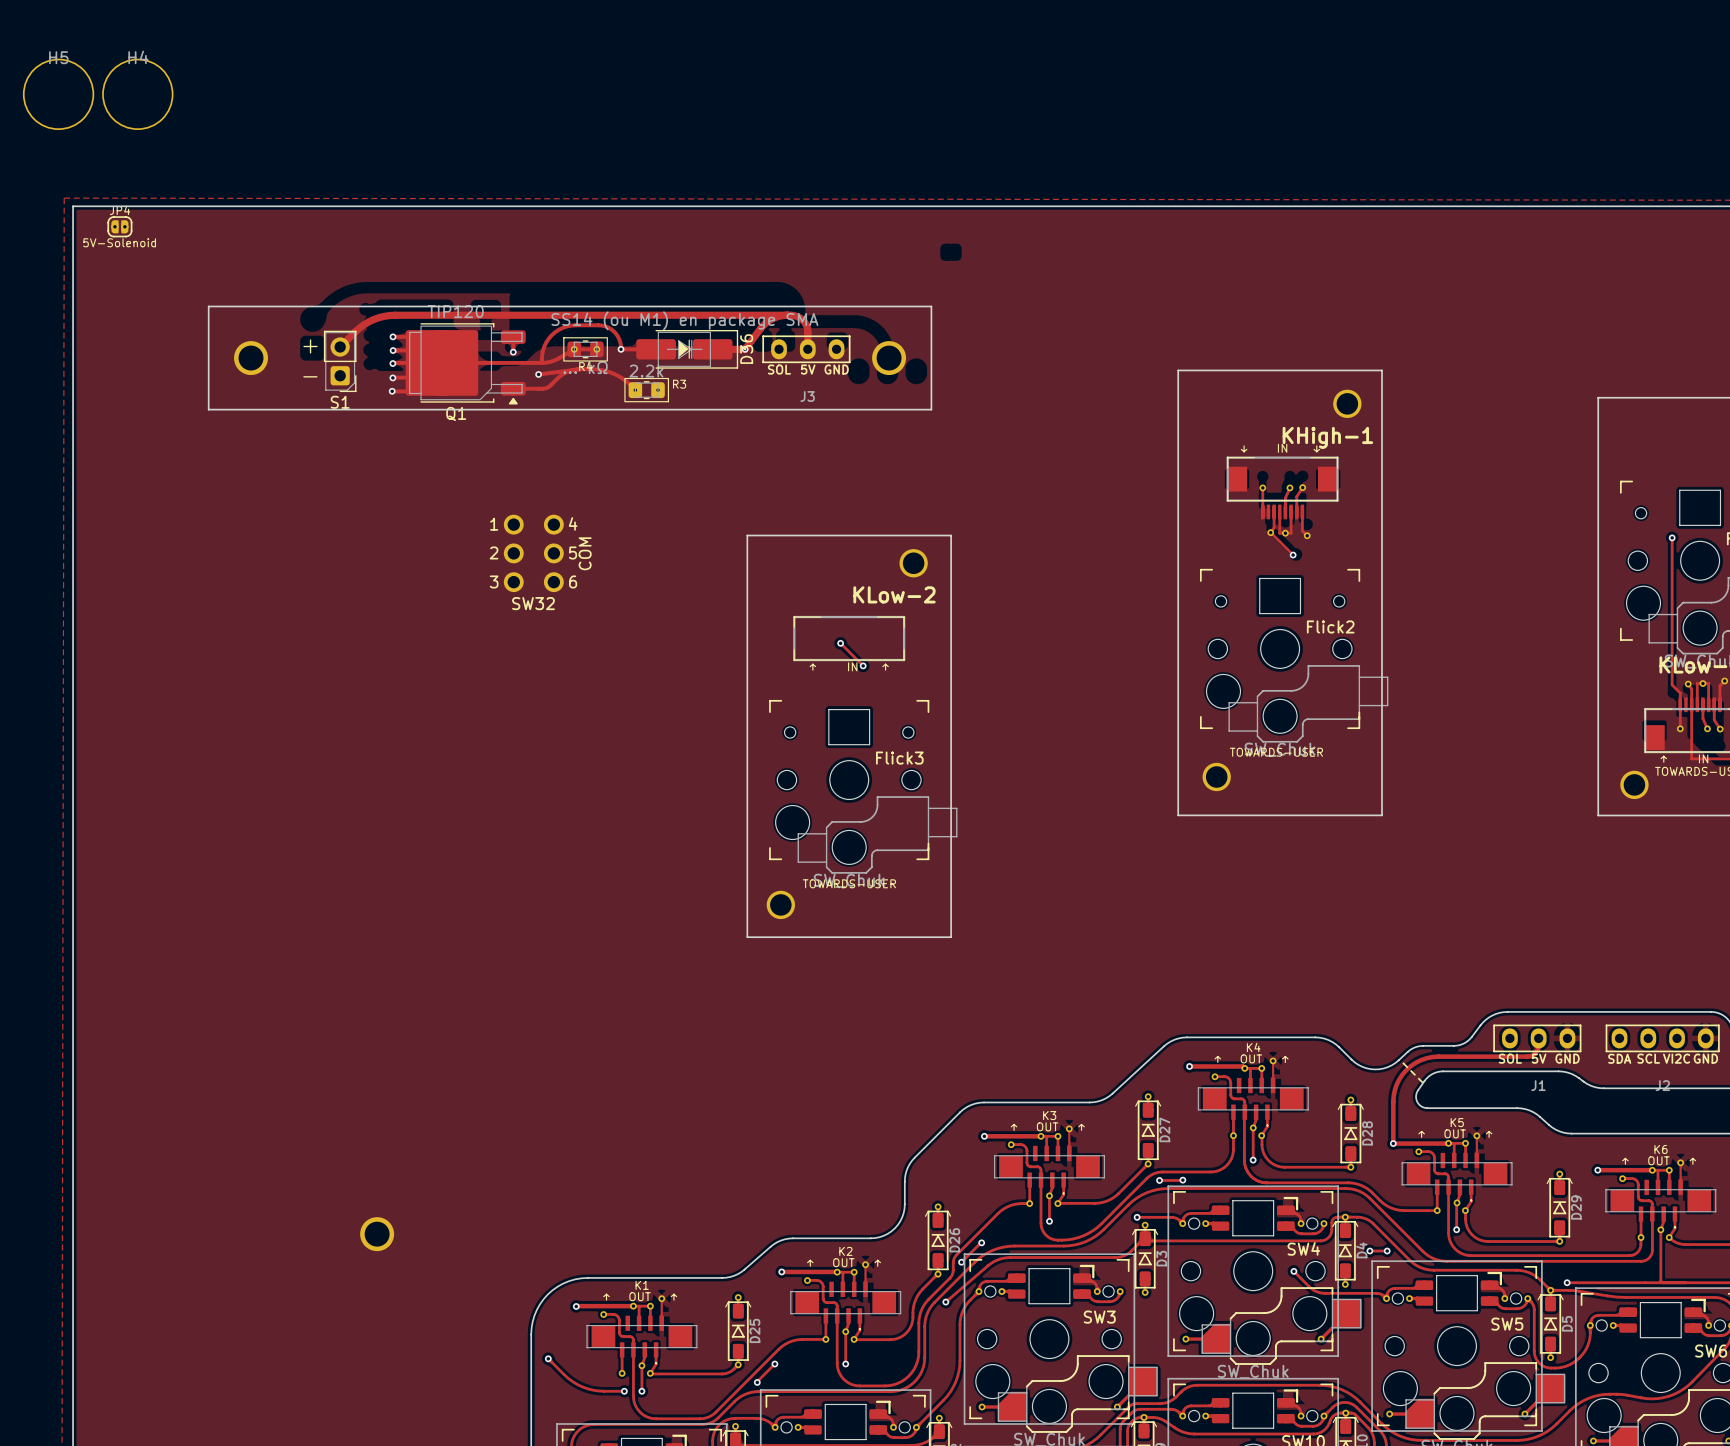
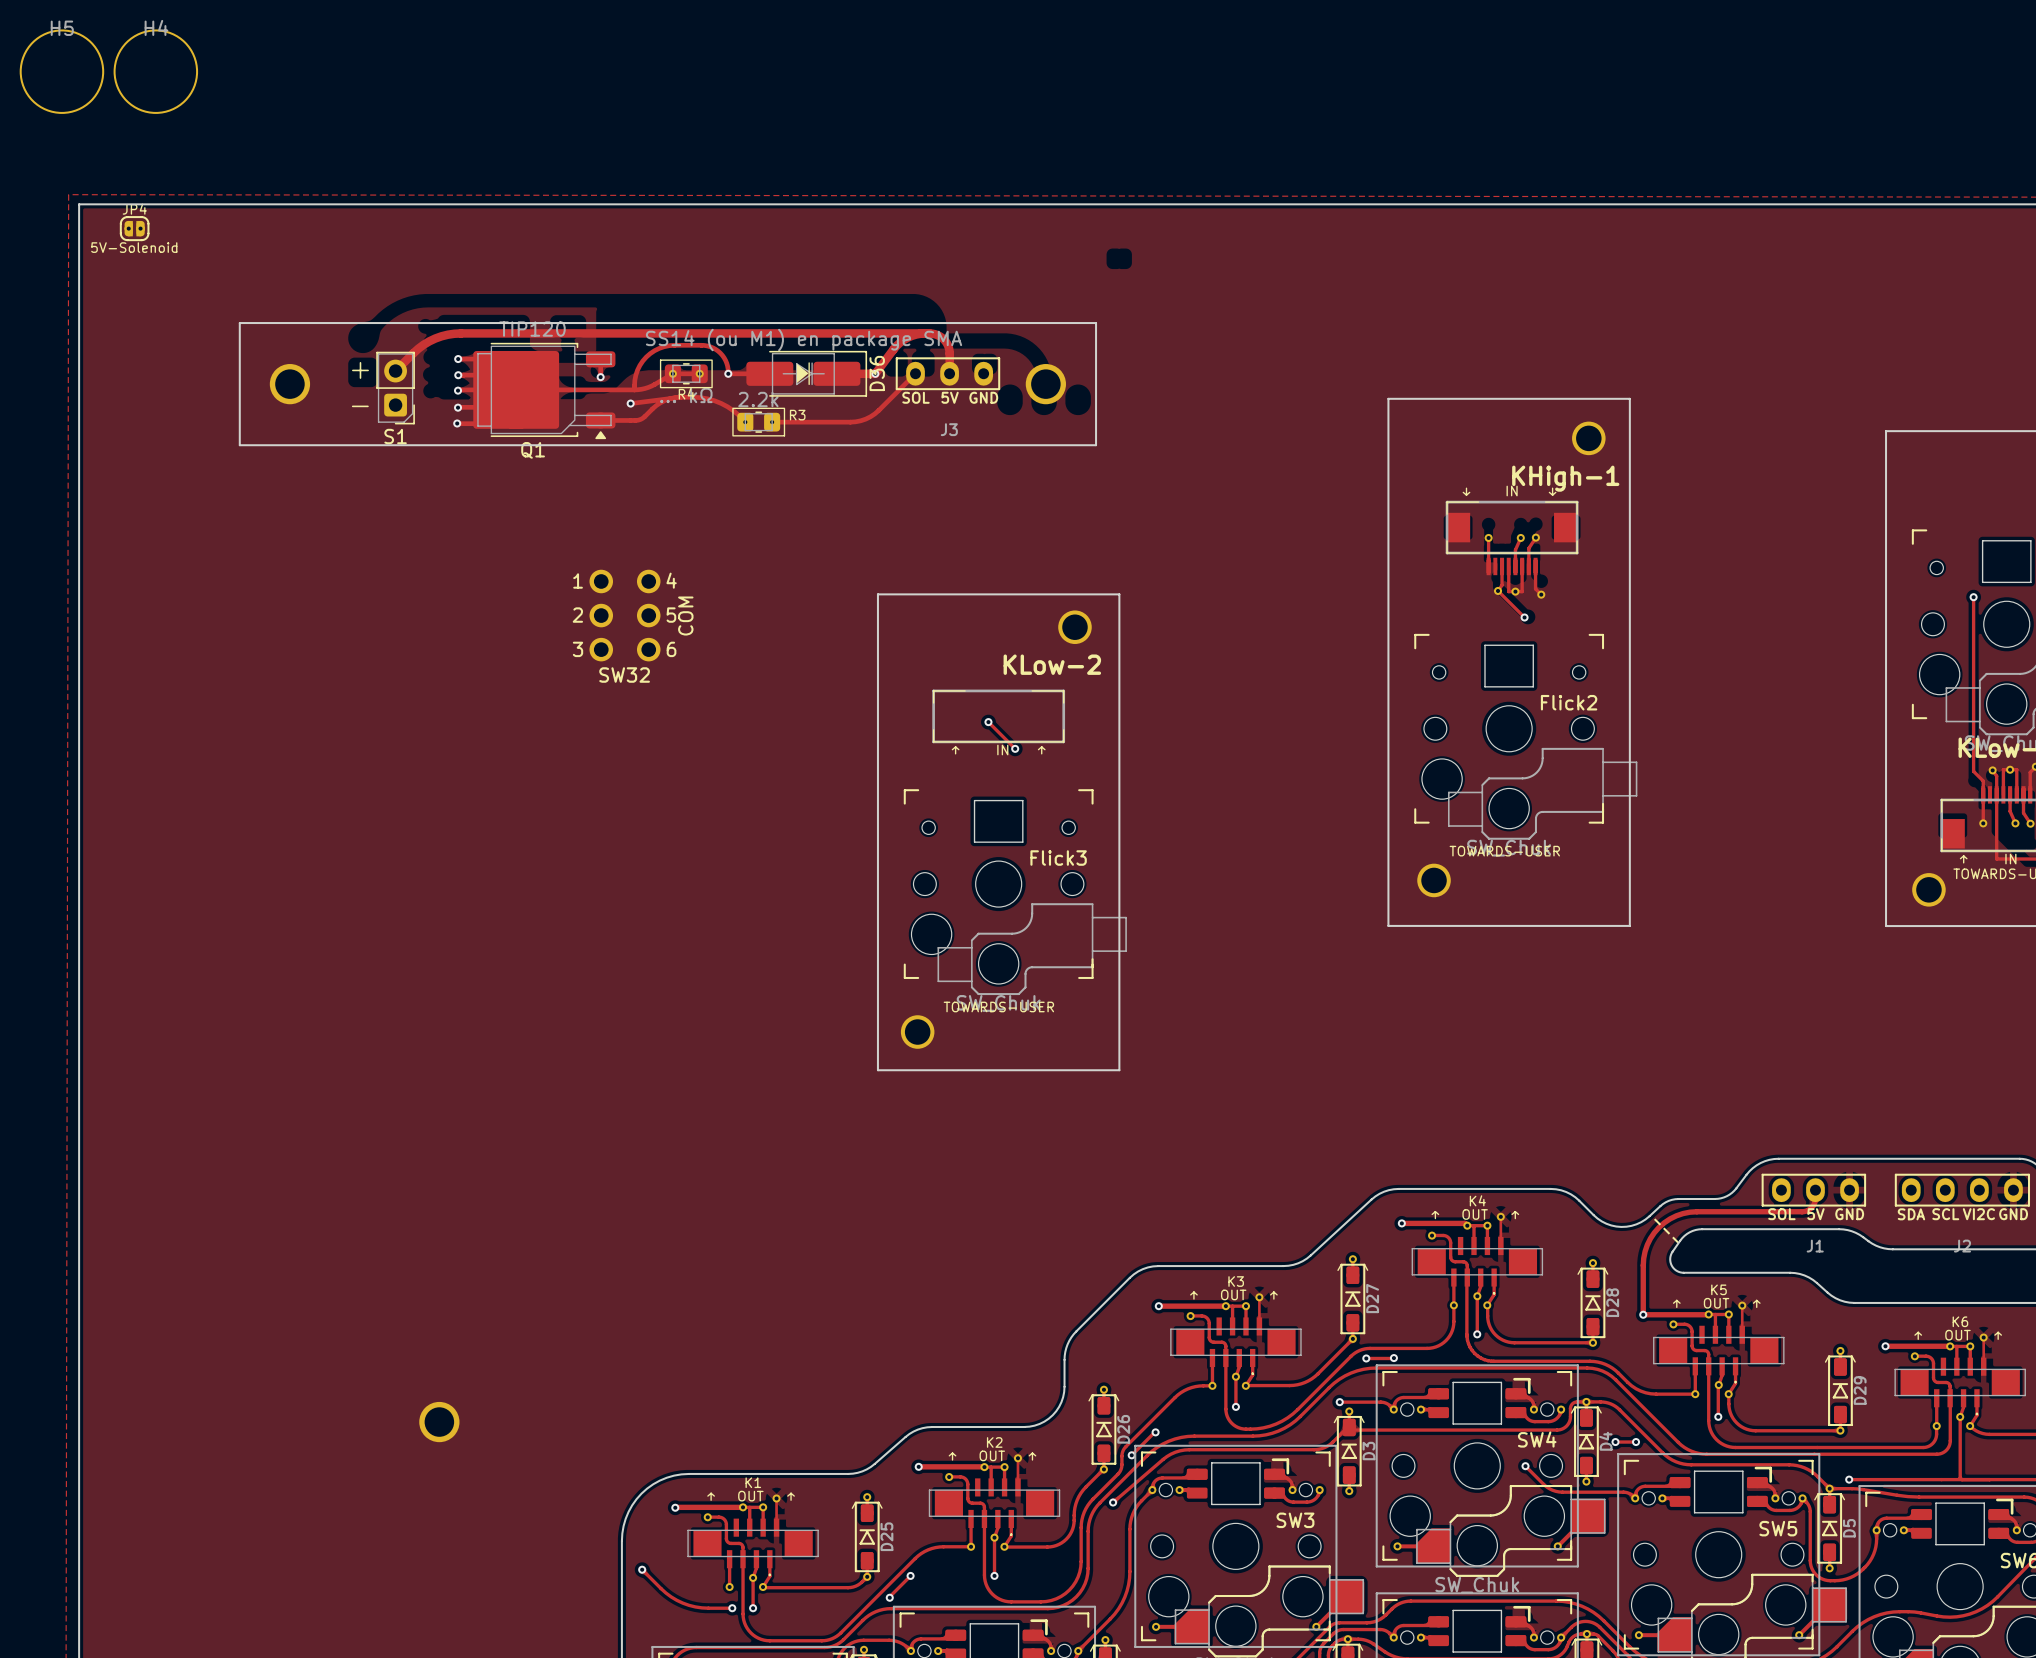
track: none -> (915, 373) (874, 413) (860, 420) (772, 422)

